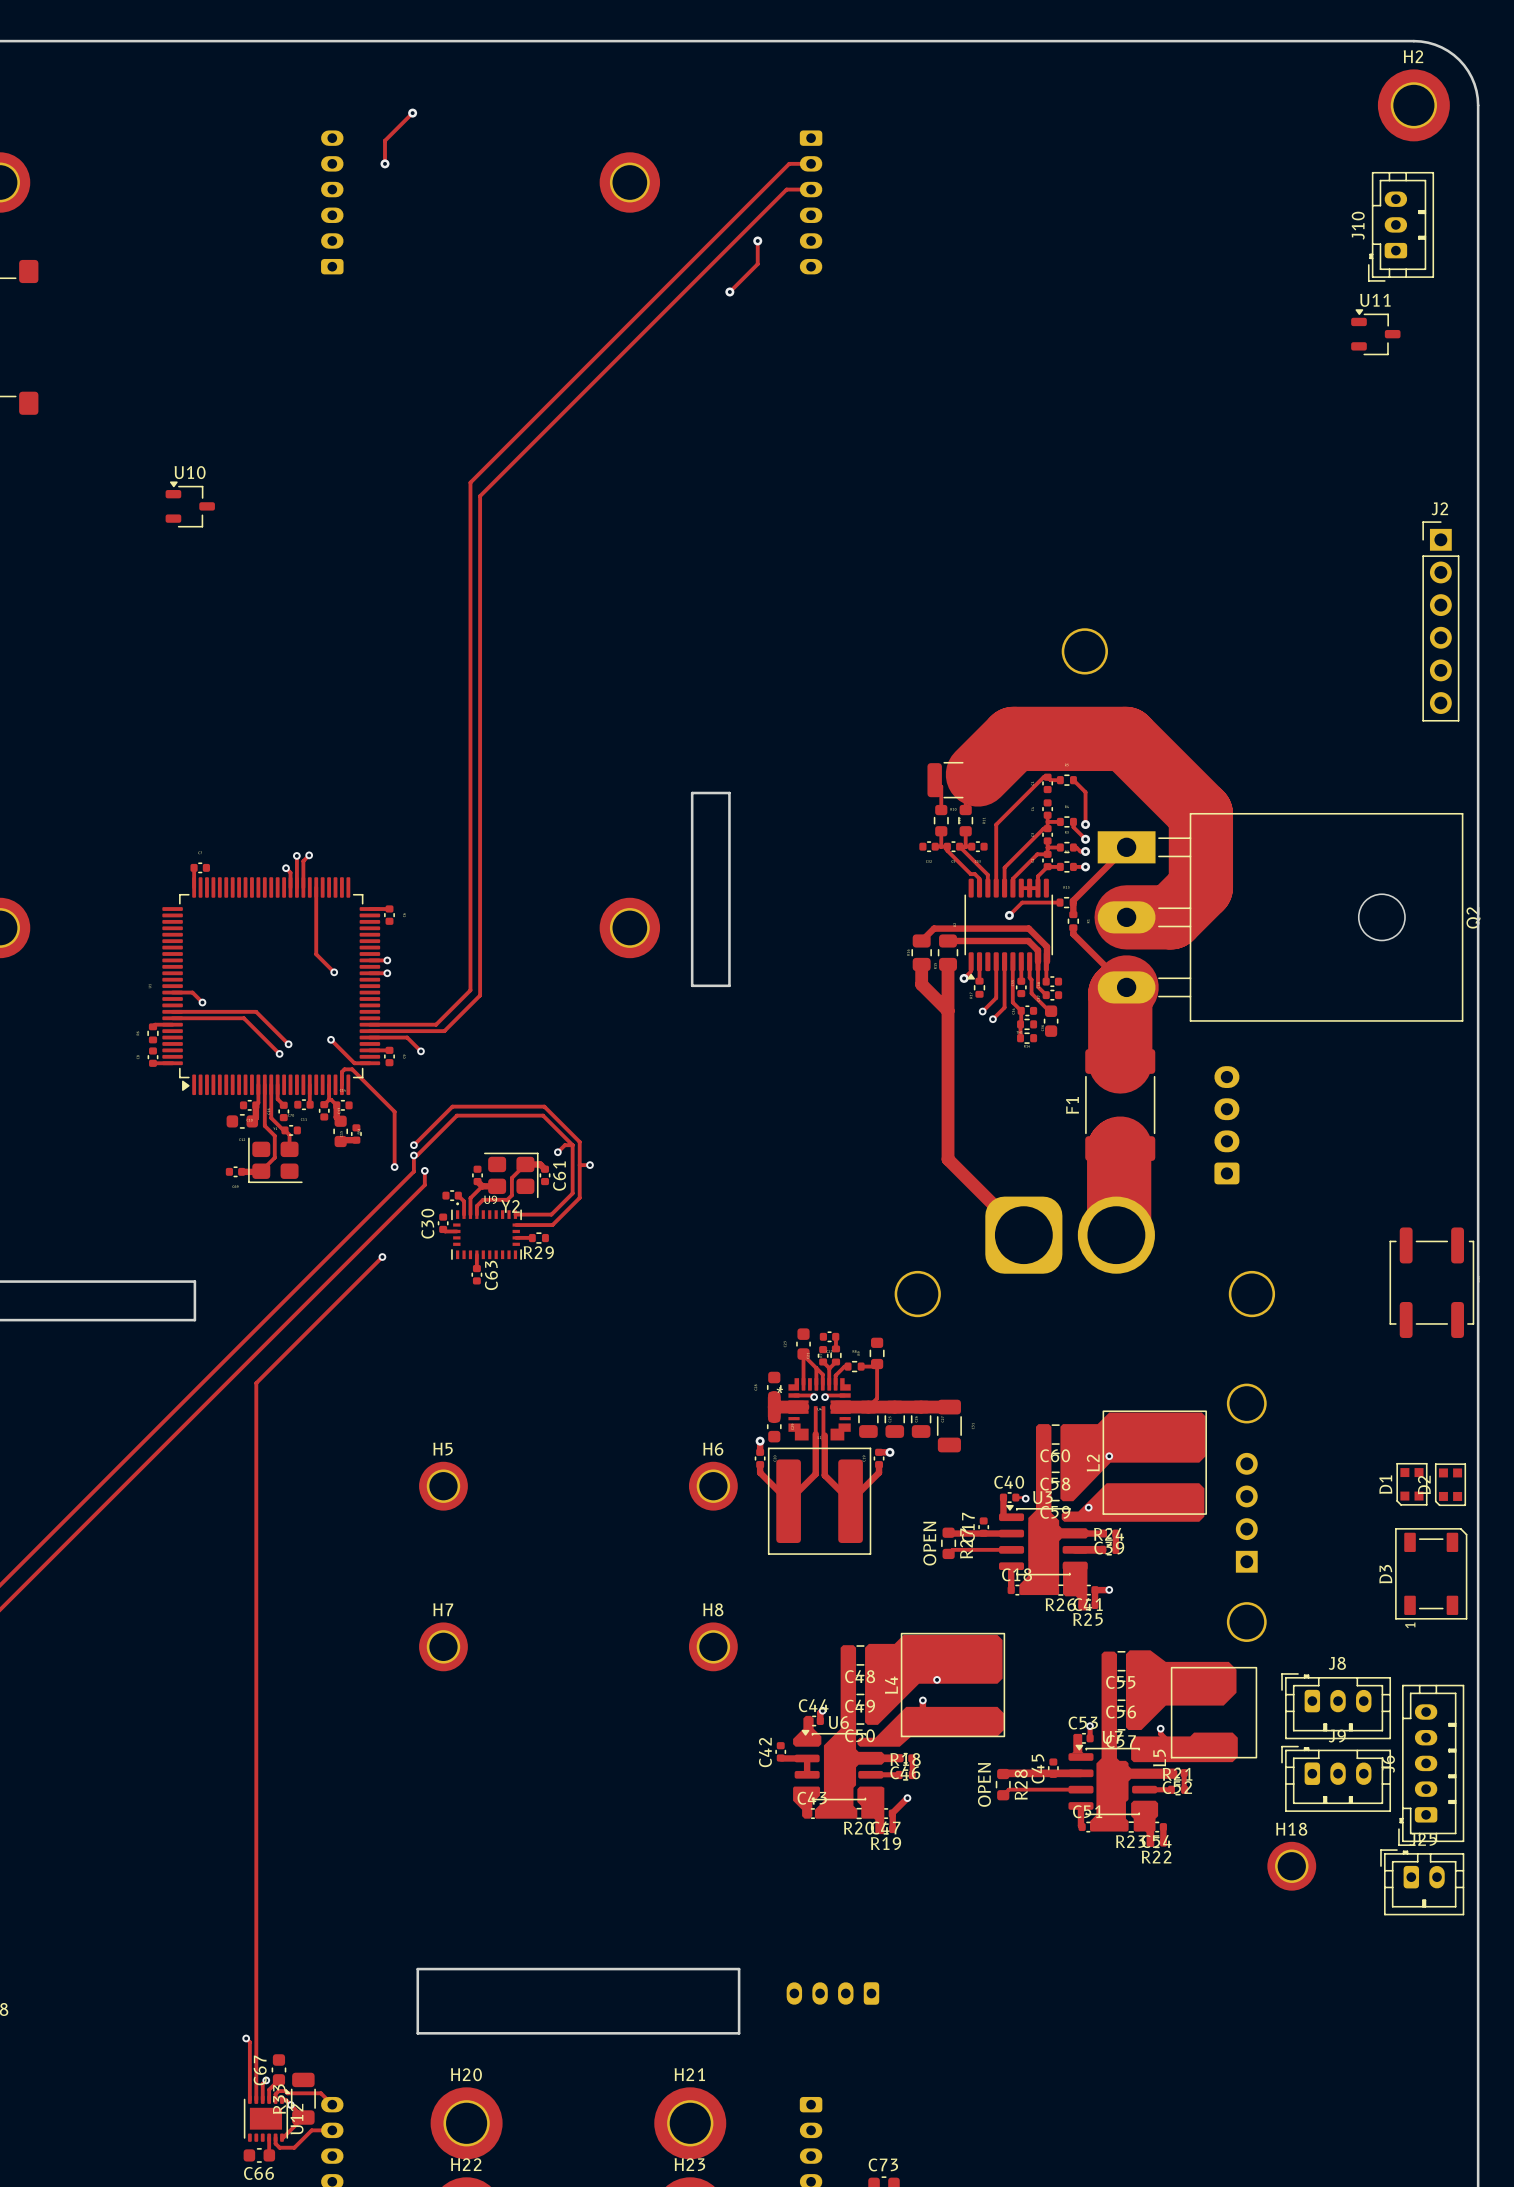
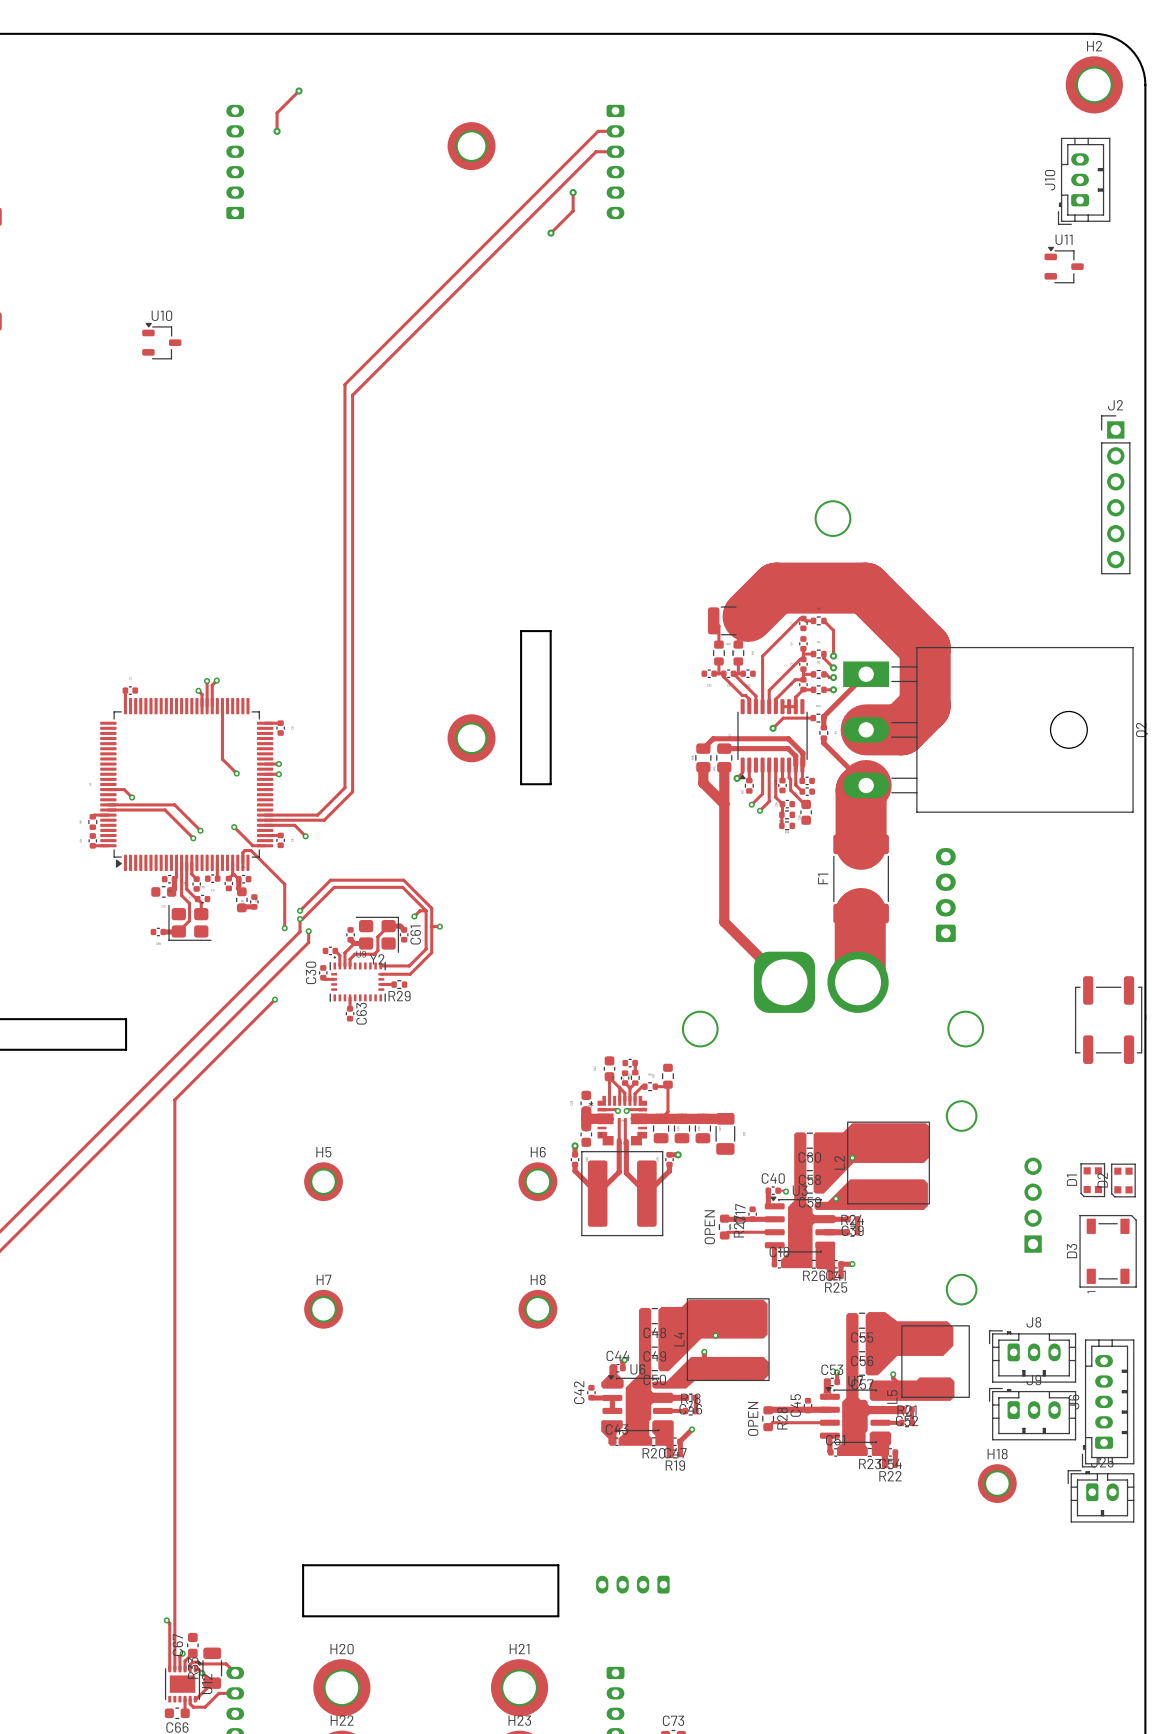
U10 position: (190, 504) -> (161, 341)
part position: (1246, 1512) -> (1033, 1205)

